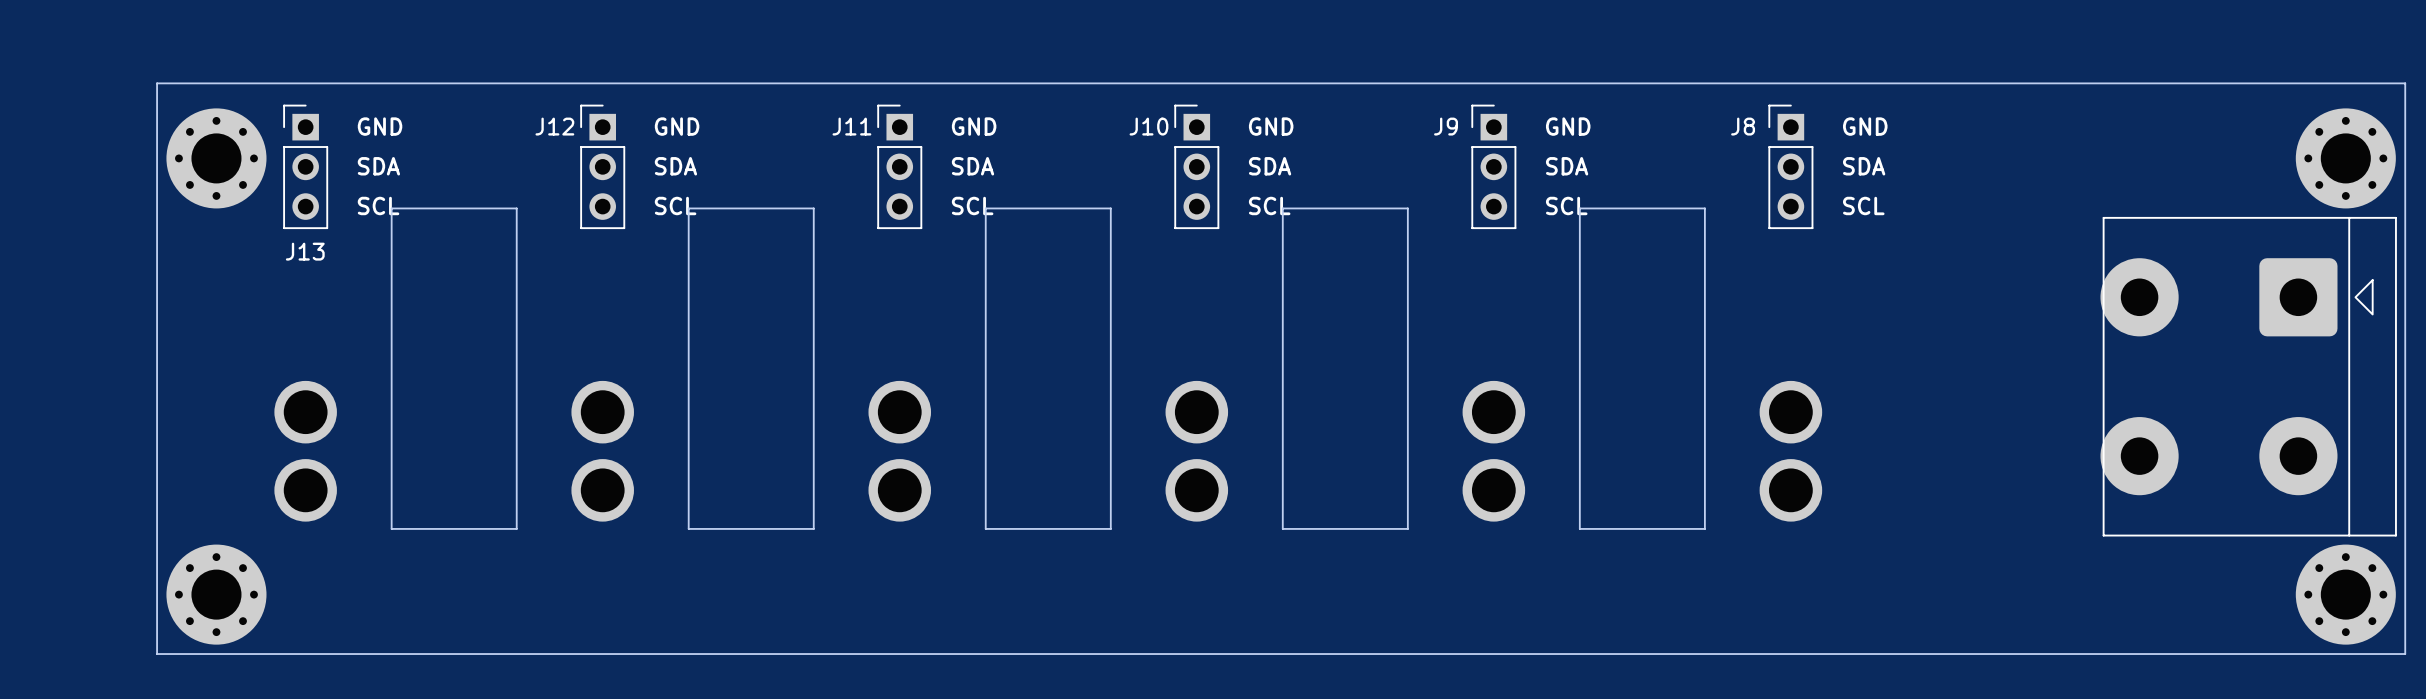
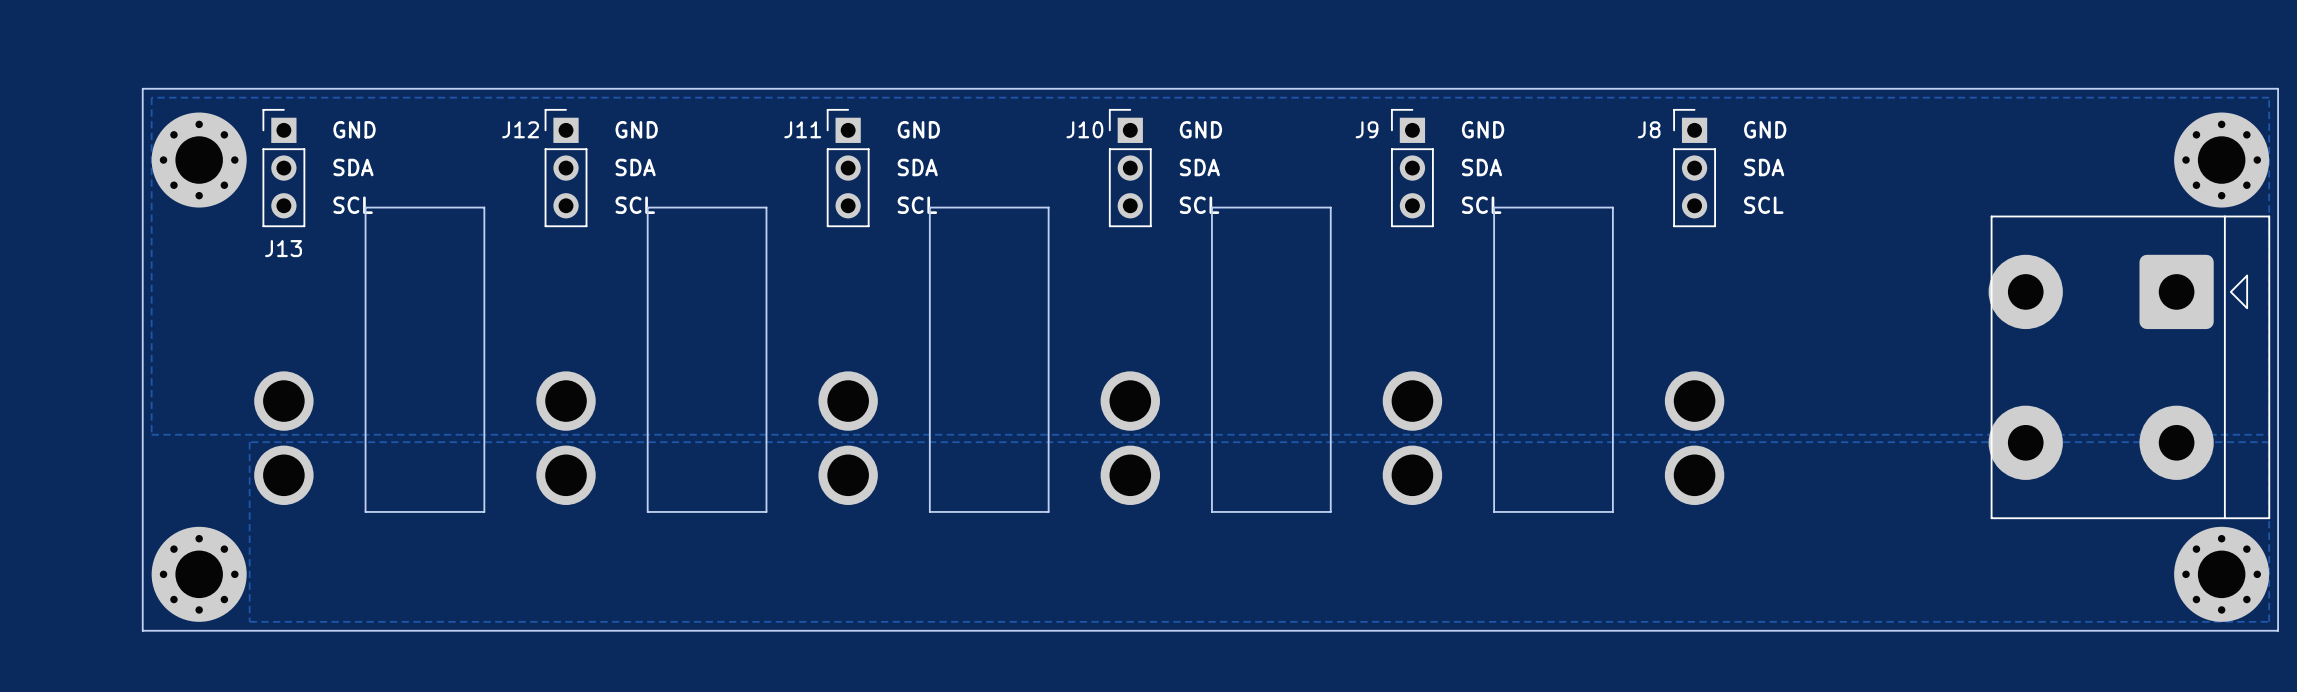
zone outline: none -> (2269, 97) (151, 97) (151, 434) (2269, 434) (2269, 97)
zone outline: none -> (2269, 442) (2269, 621) (249, 621) (249, 442) (2269, 442)

